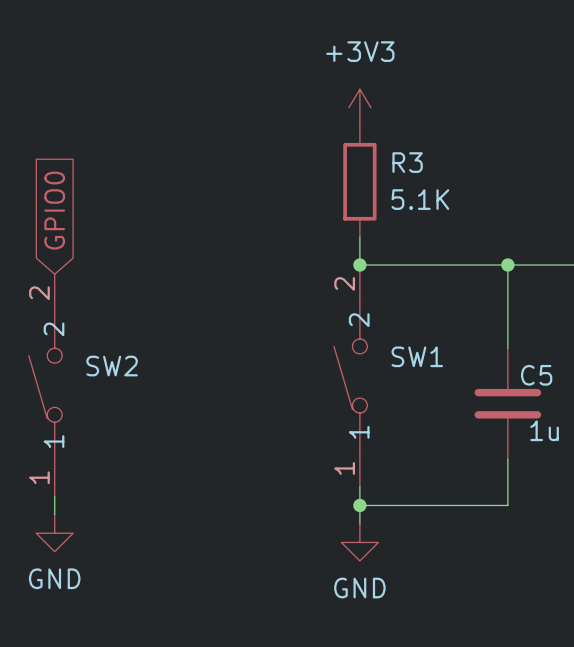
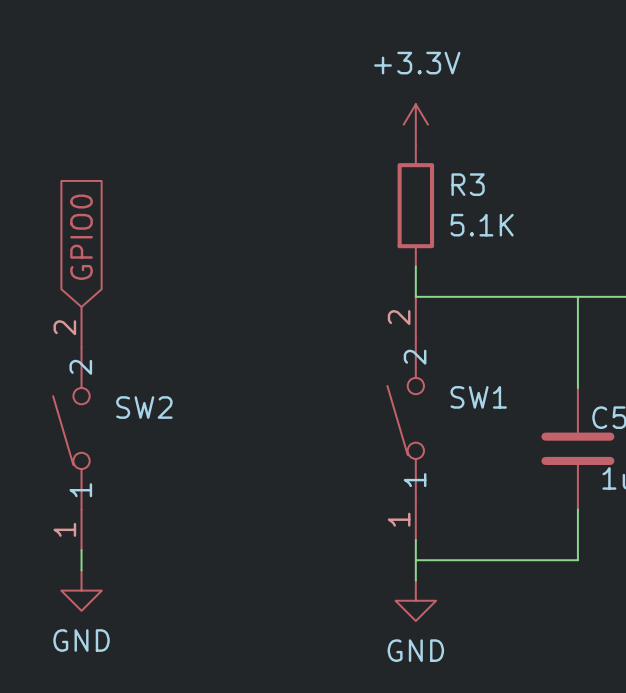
power symbol: +3V3 (359, 107) -> +3.3V (415, 124)
junction: (359, 265) -> none
junction: (507, 265) -> none
junction: (359, 505) -> none

